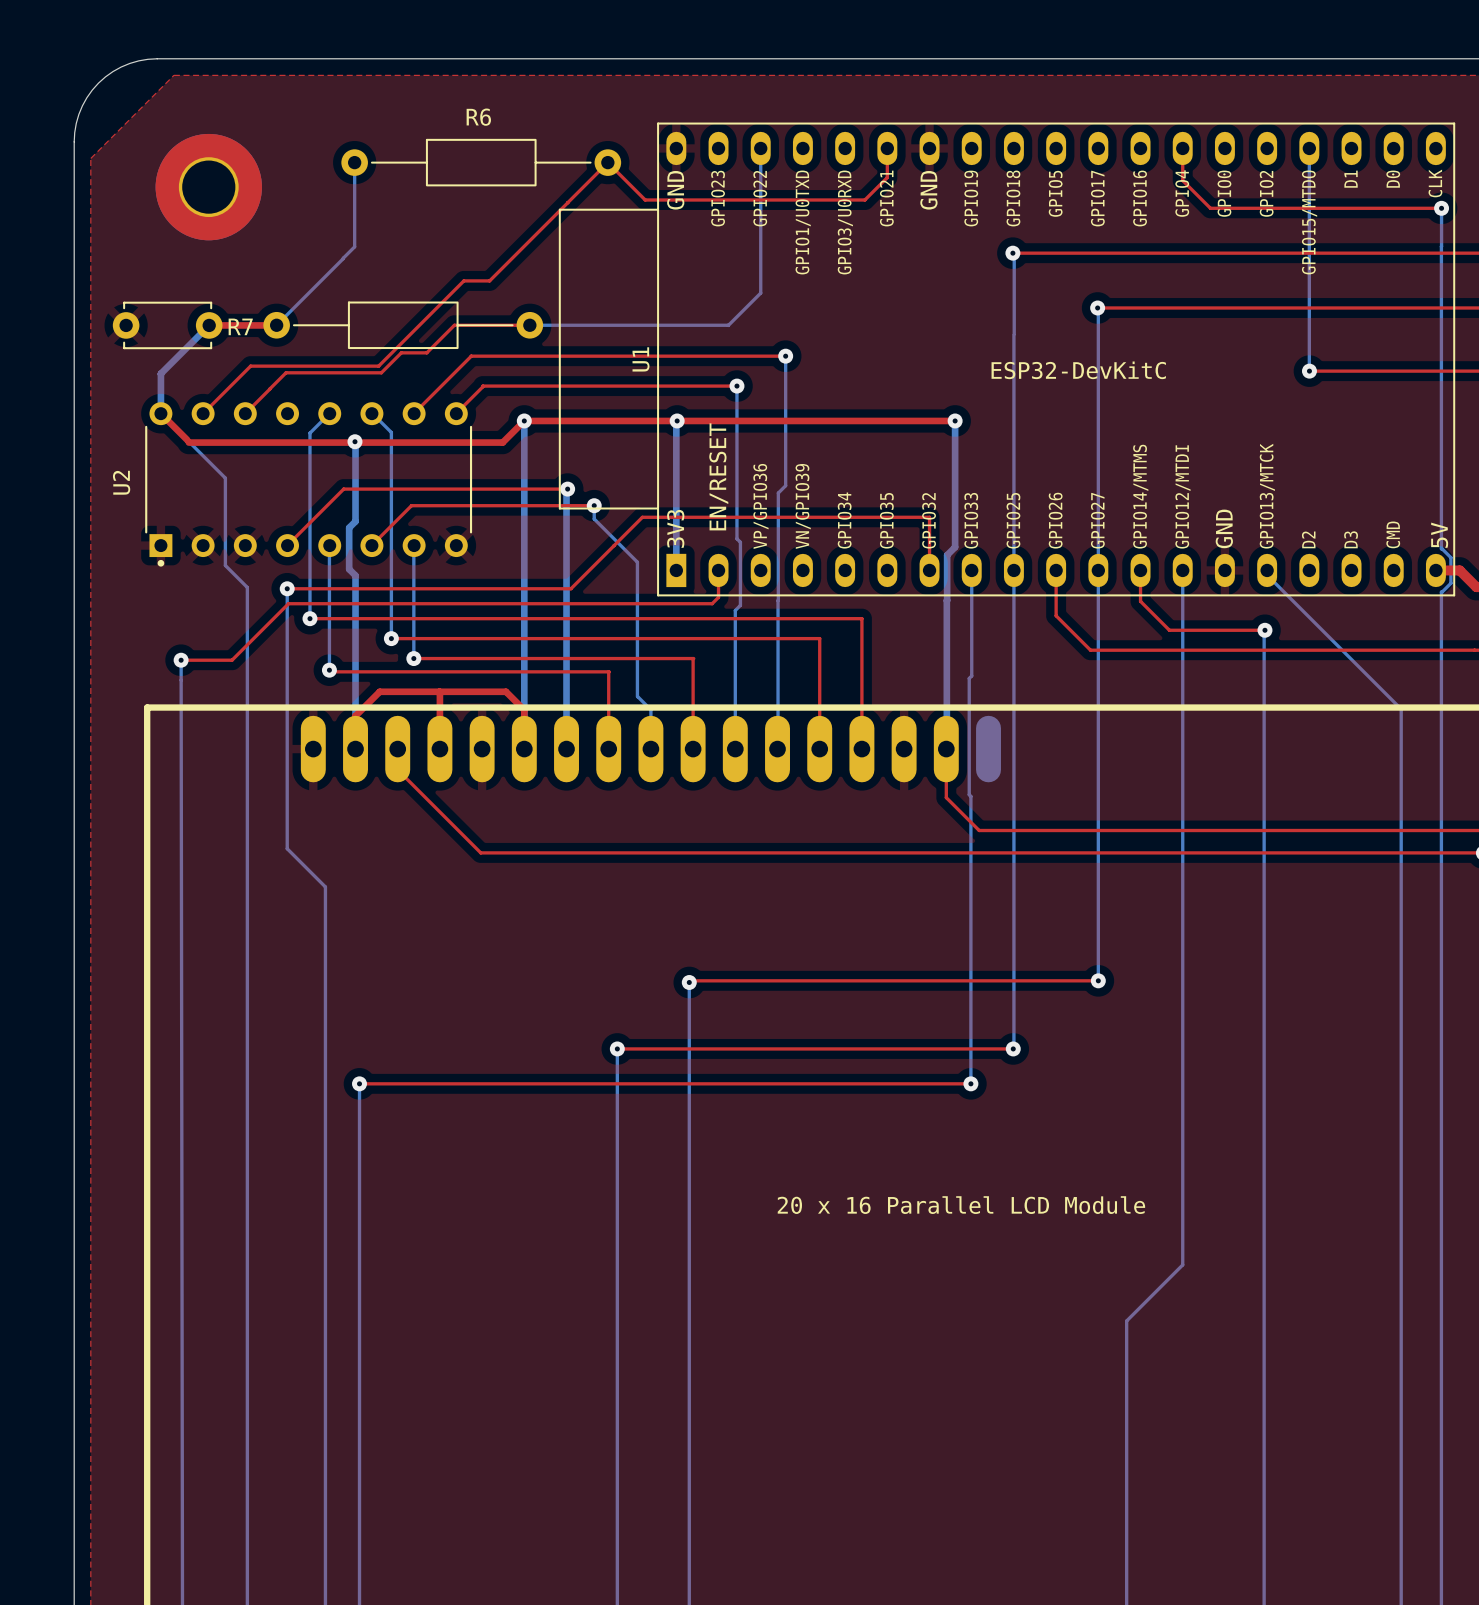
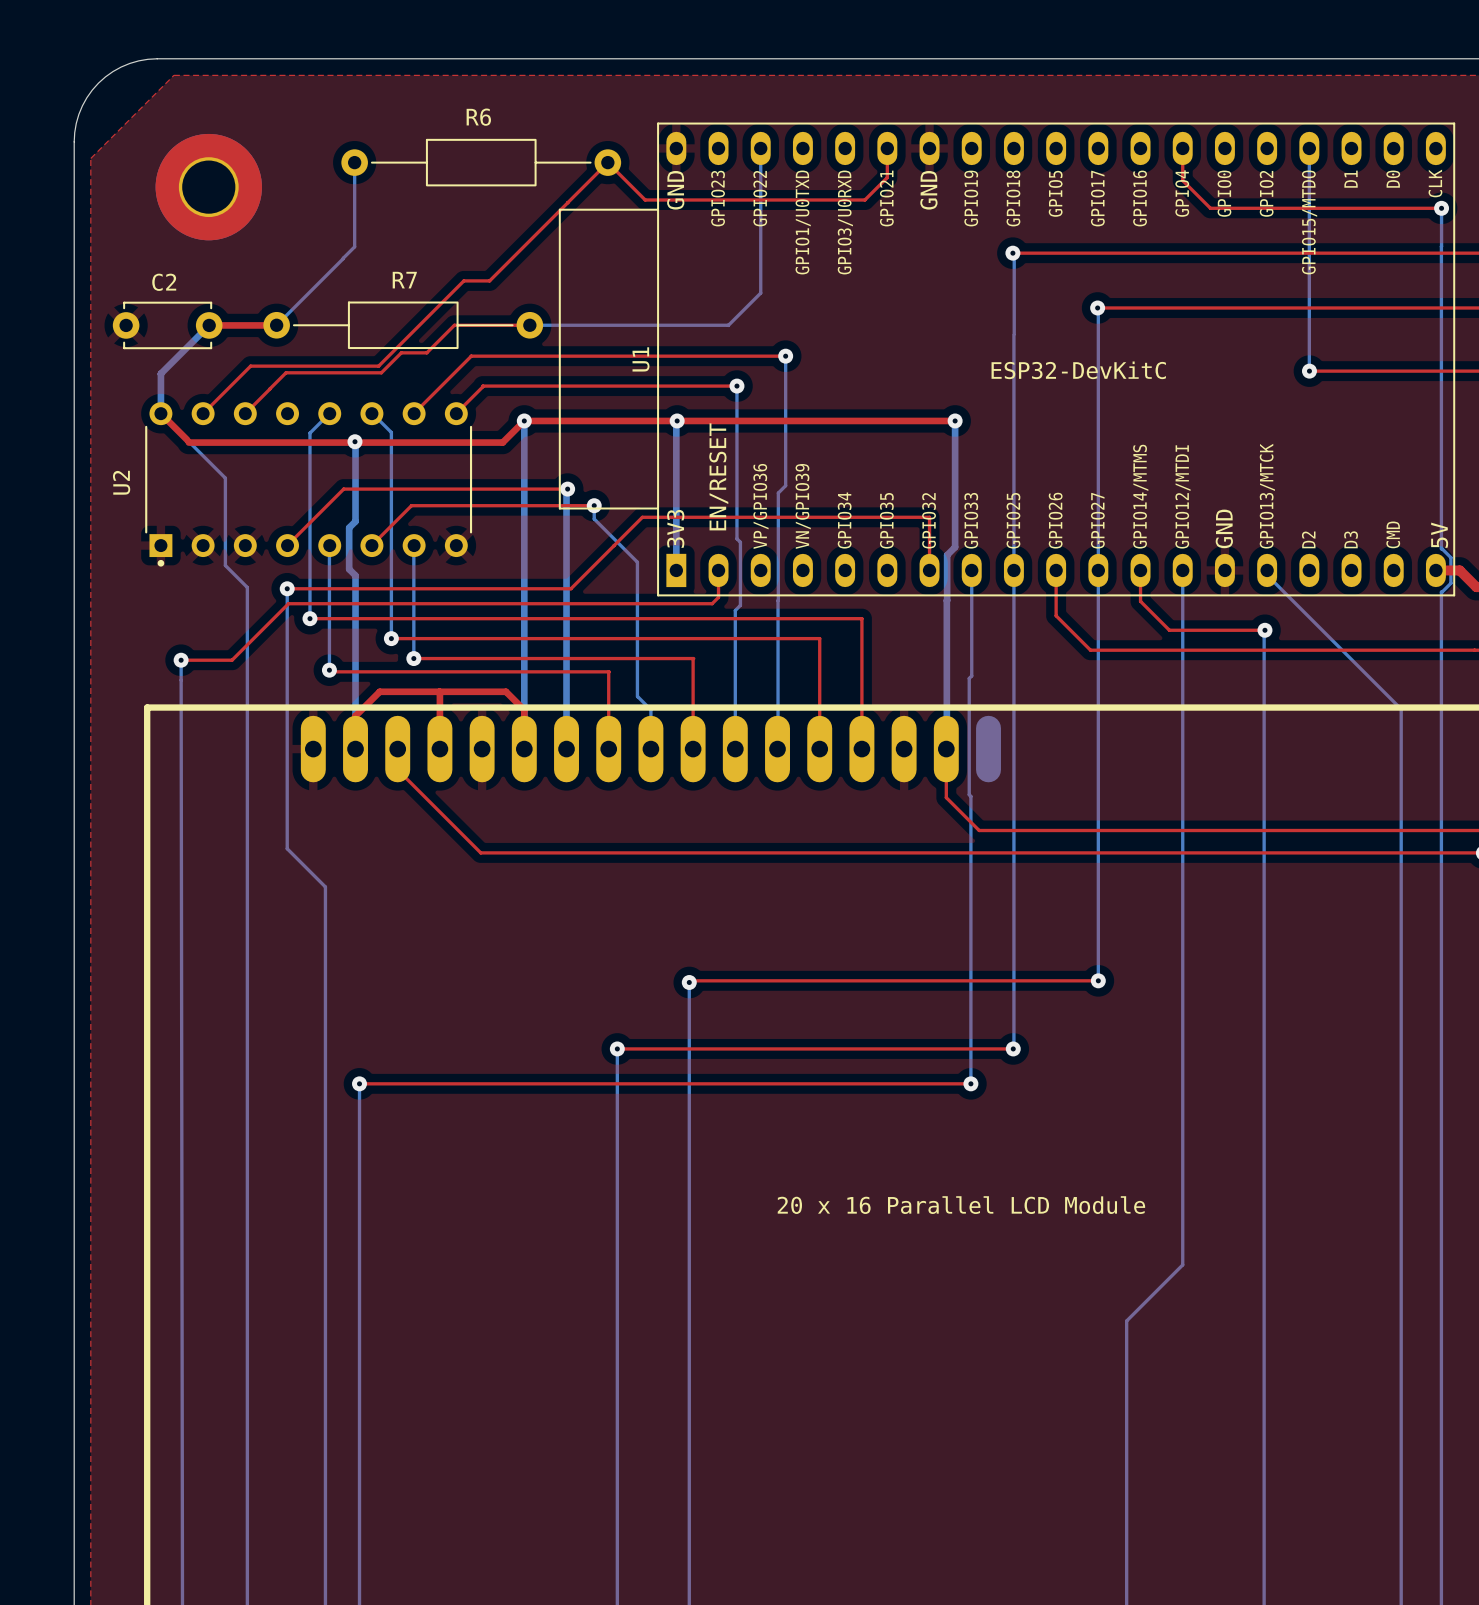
C2 name: none -> C2 (164, 282)
R7 name position: R7 (240, 326) -> R7 (404, 280)

